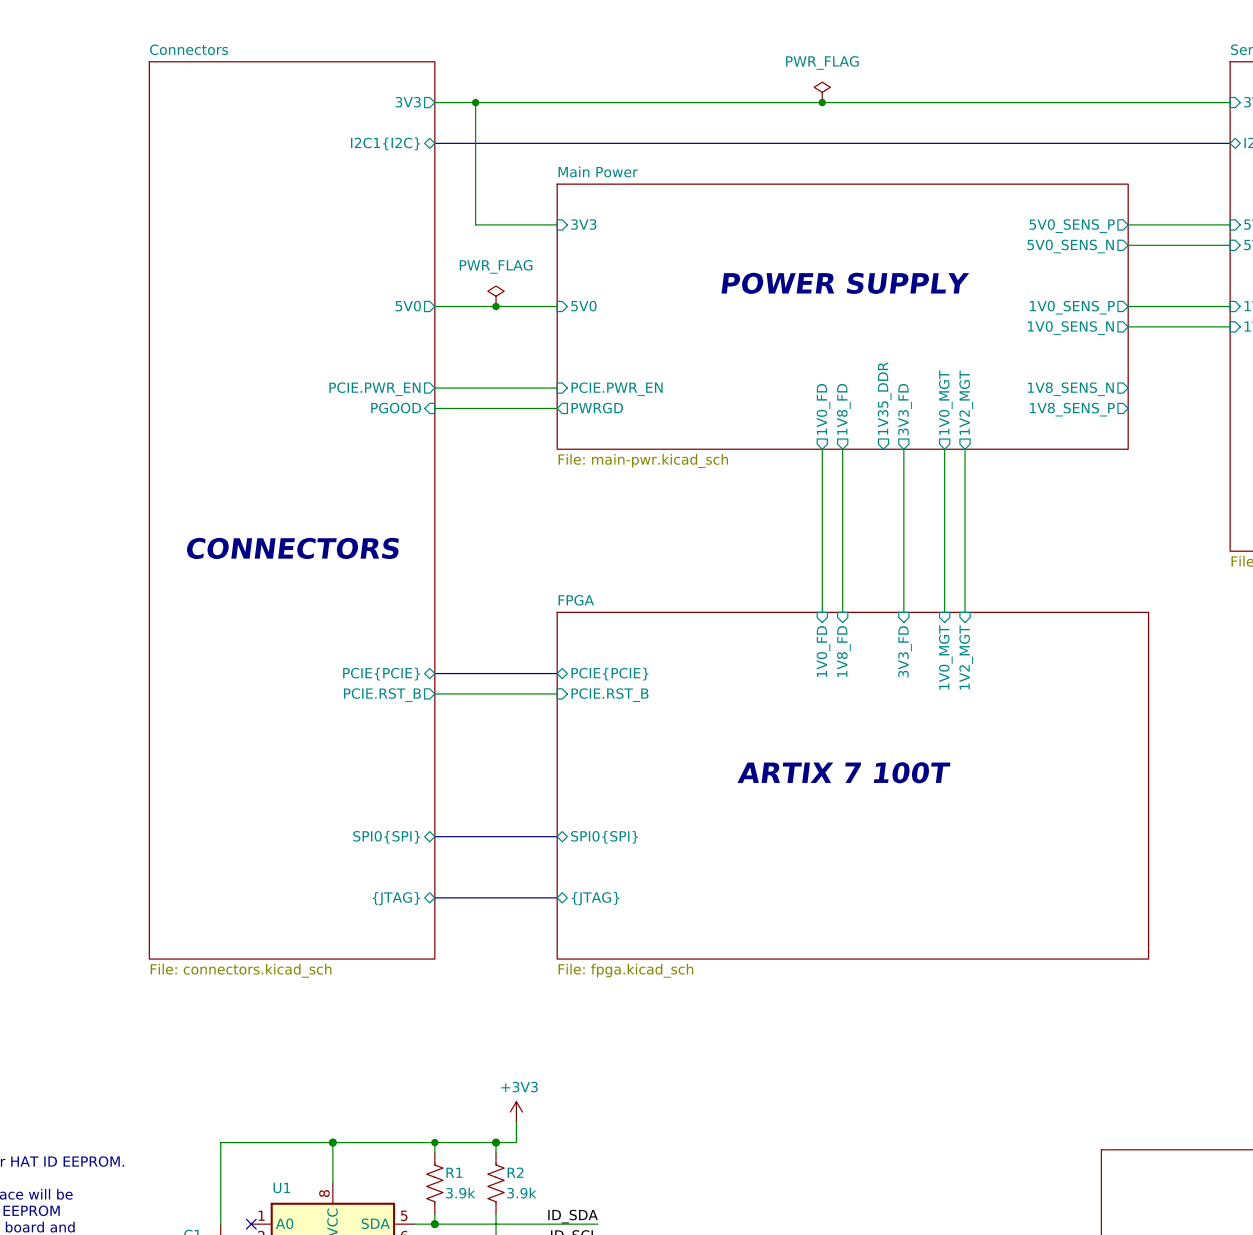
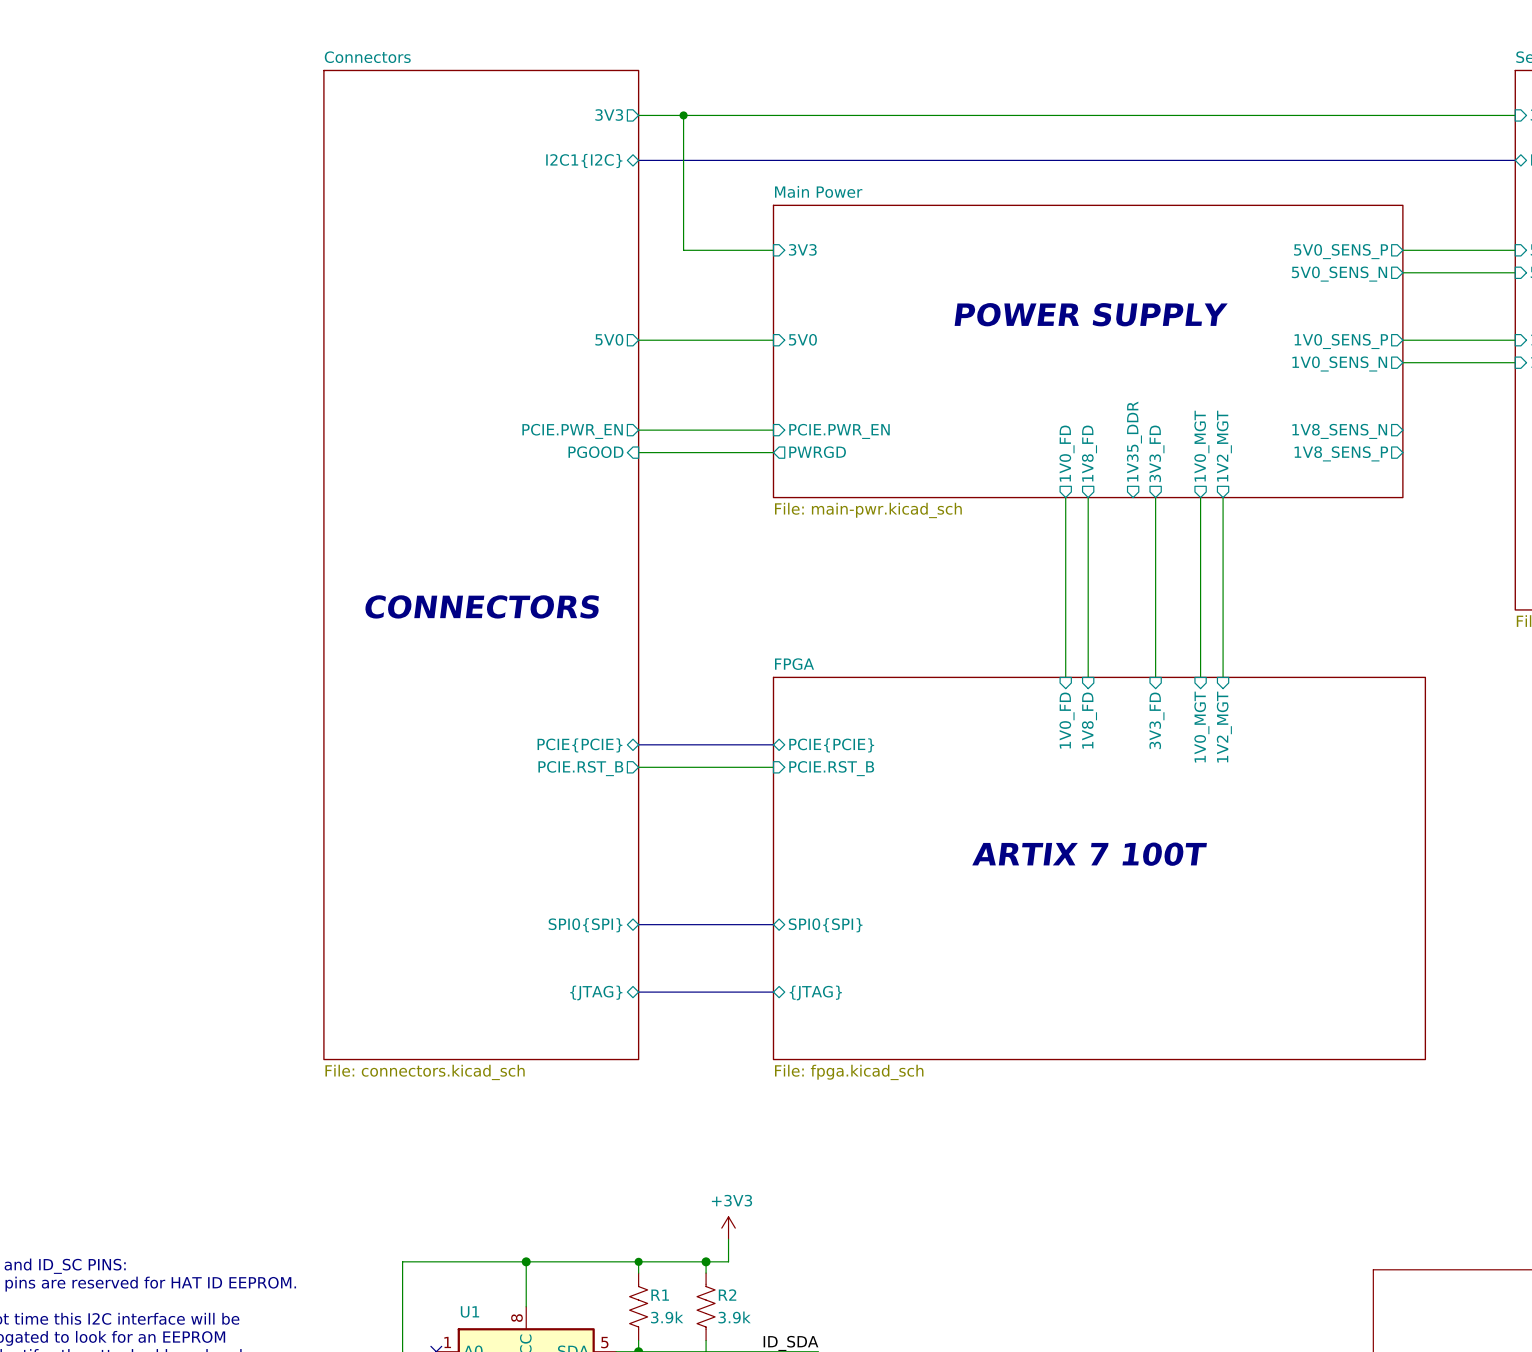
power symbol: PWR_FLAG (822, 92) -> none
junction: (822, 102) -> none
power symbol: PWR_FLAG (496, 296) -> none
junction: (496, 306) -> none

